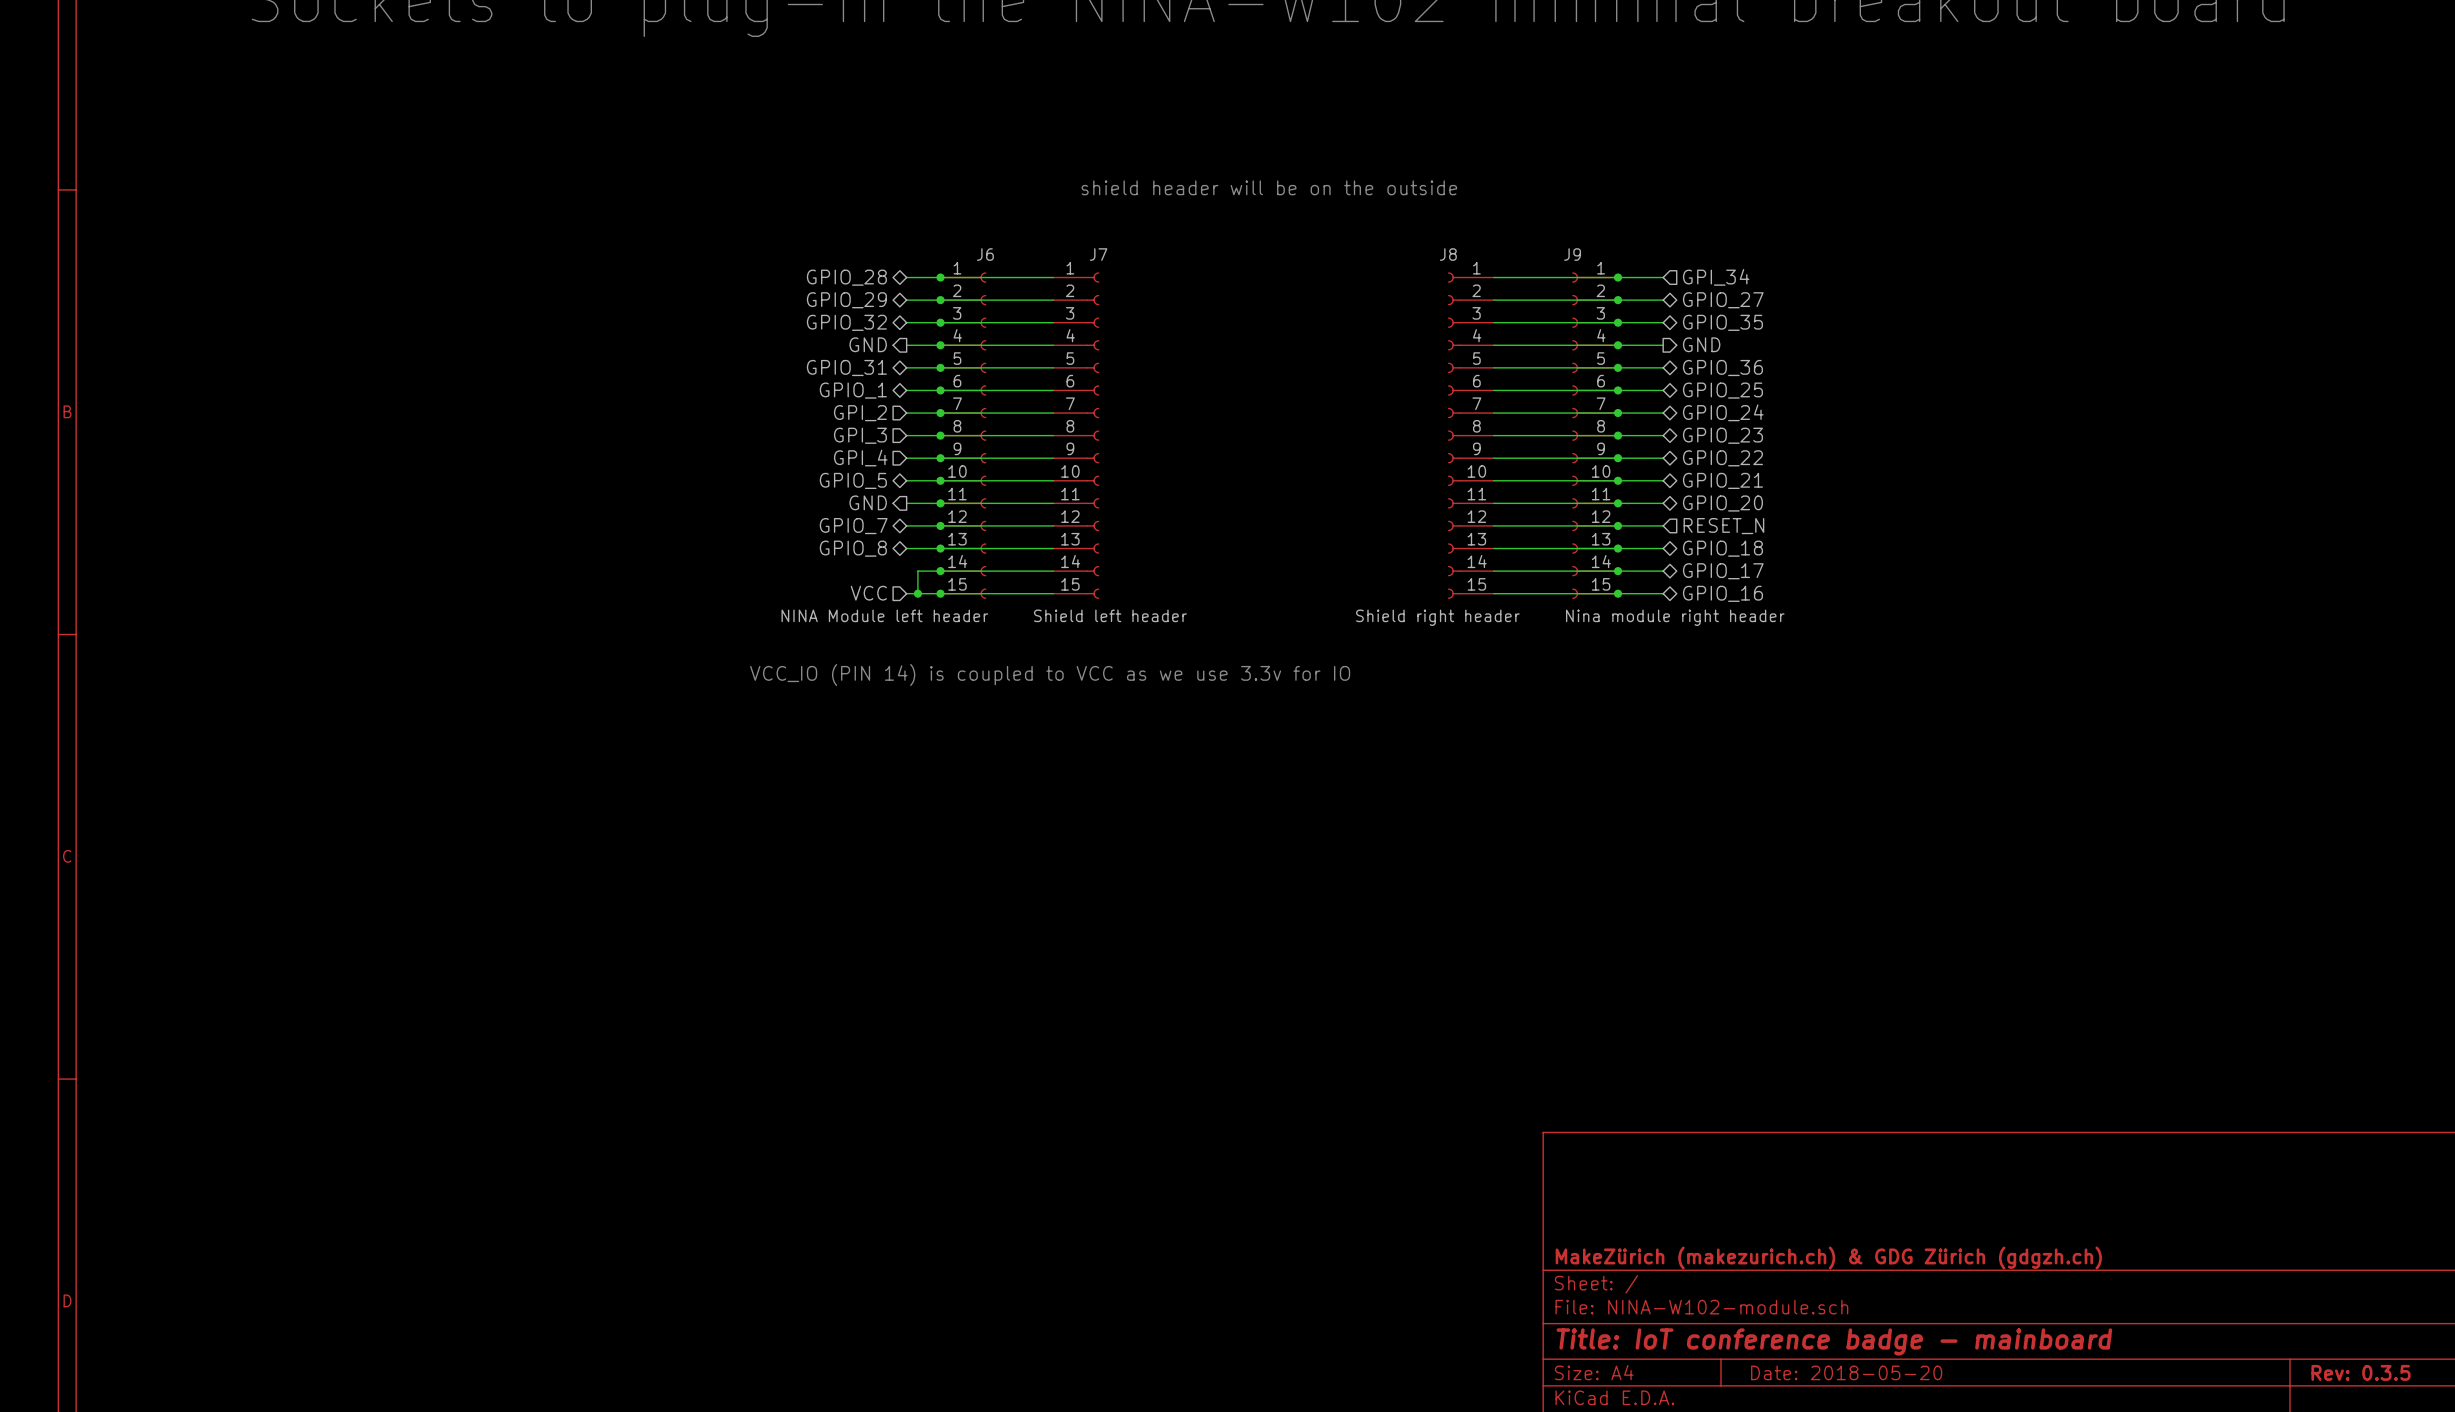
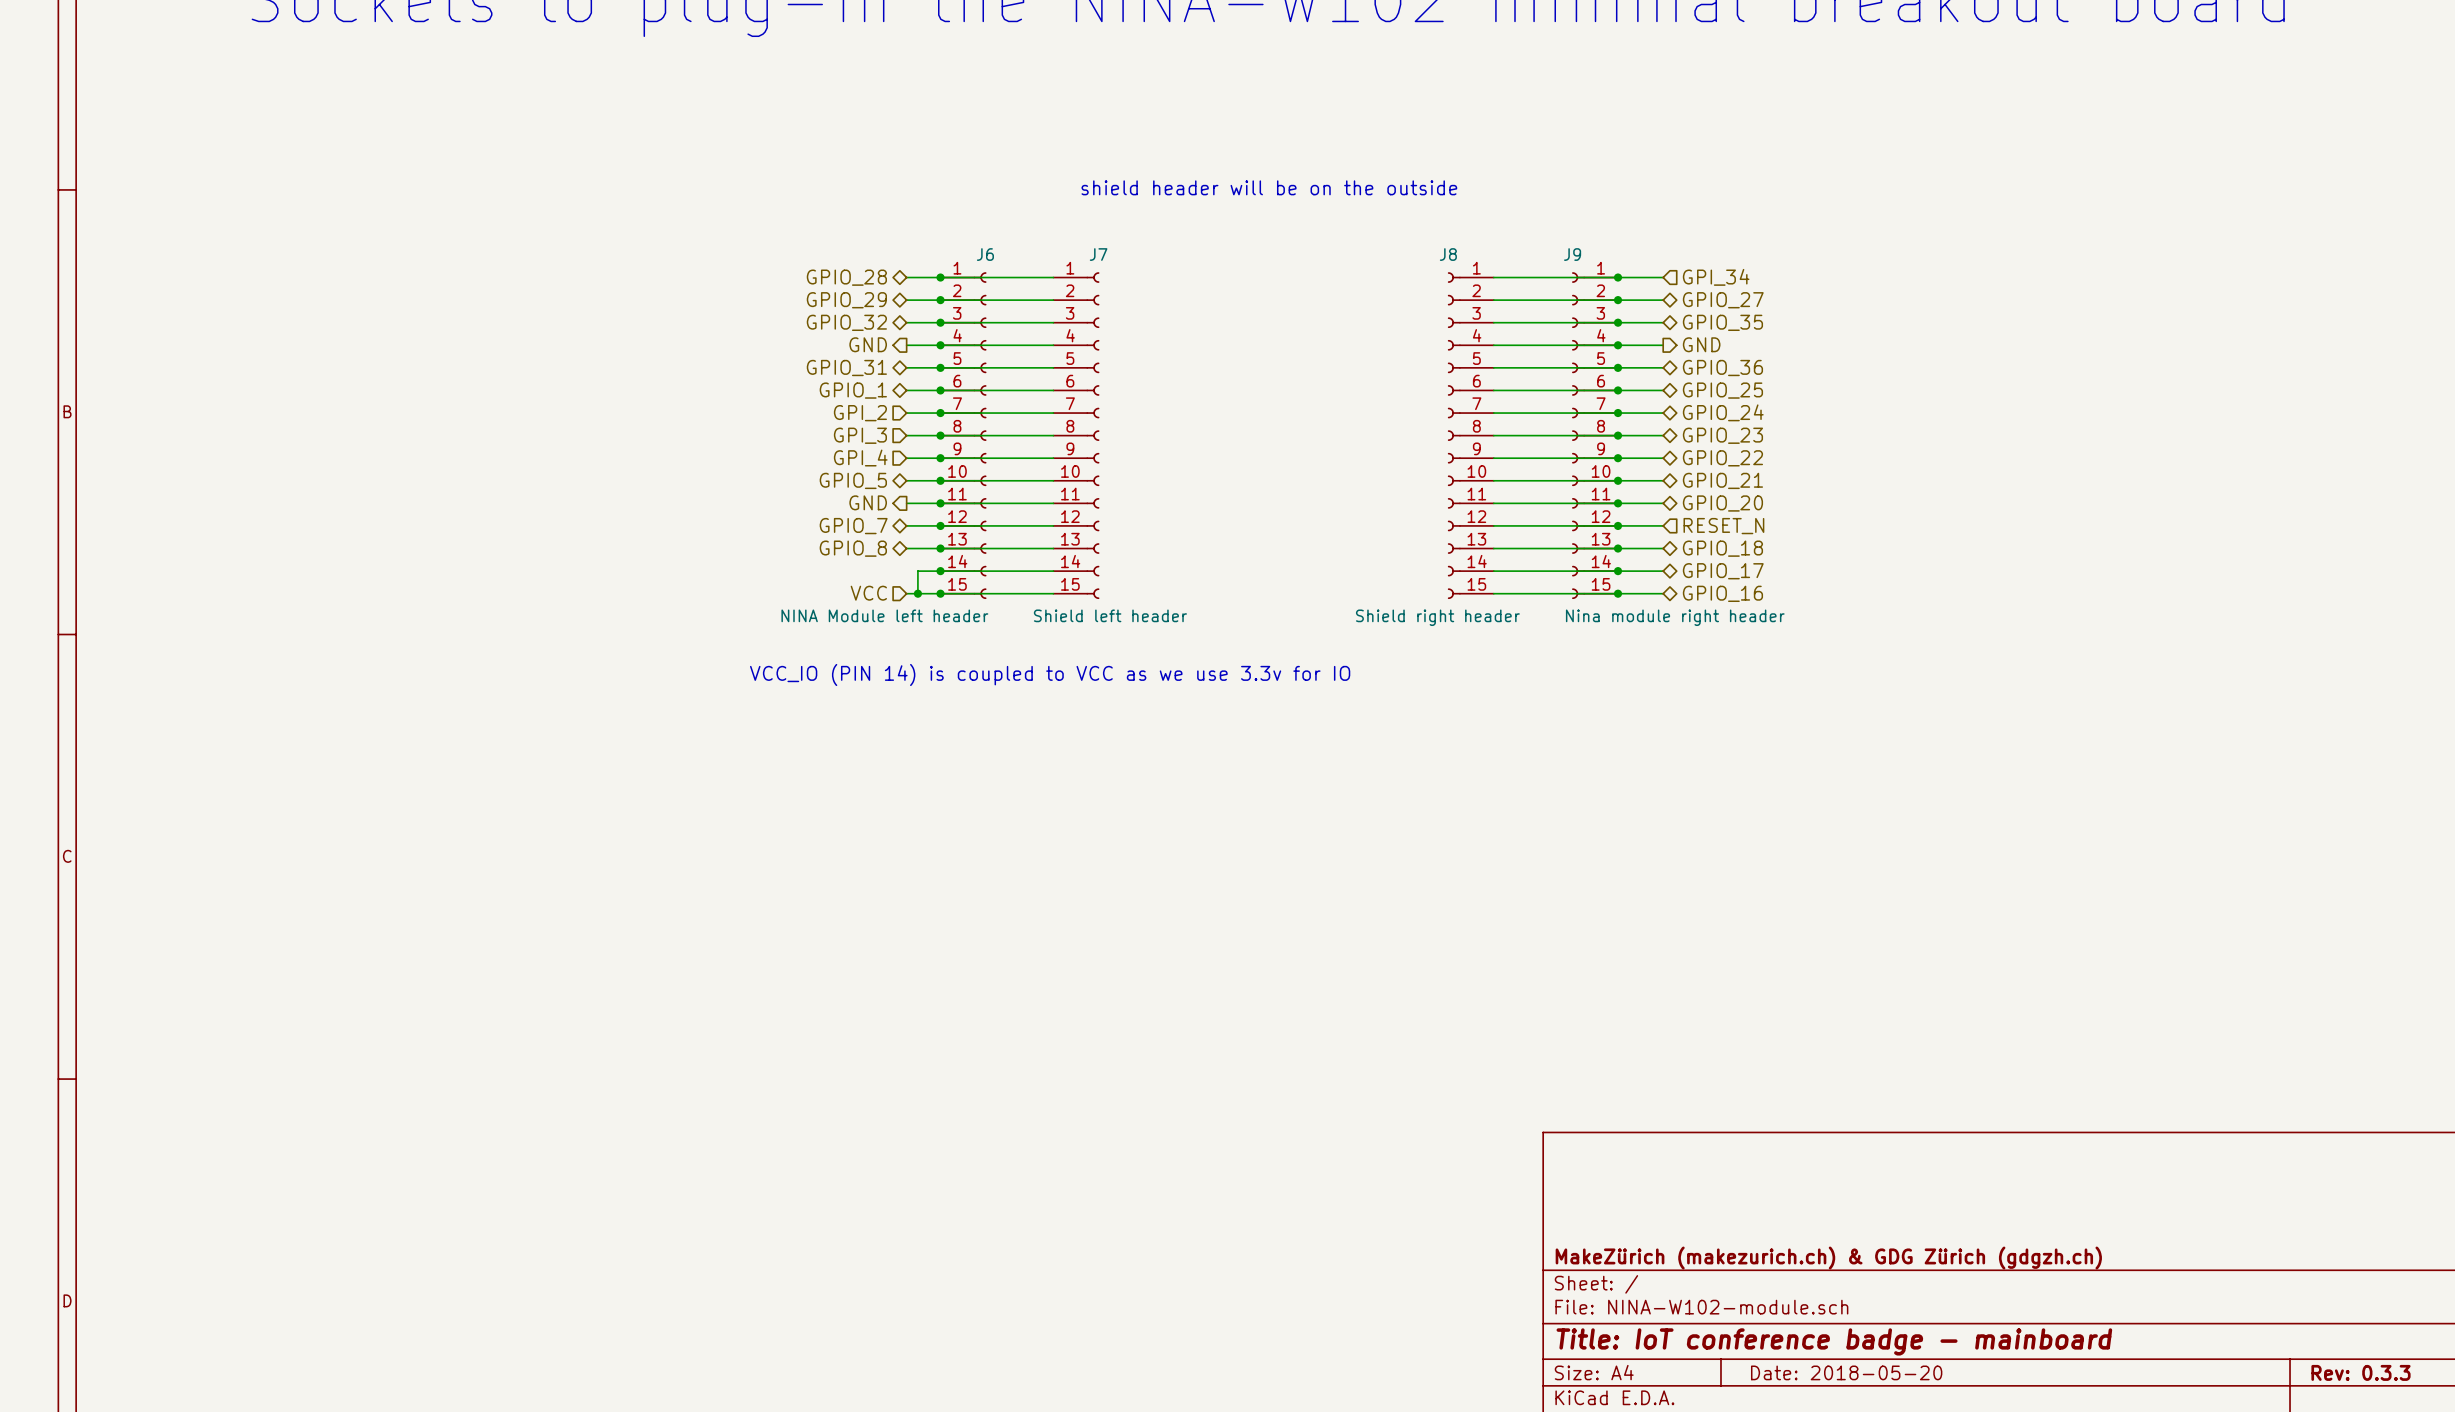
title block: Rev: 0.3.5 (2360, 1372) -> Rev: 0.3.3 (2360, 1372)

